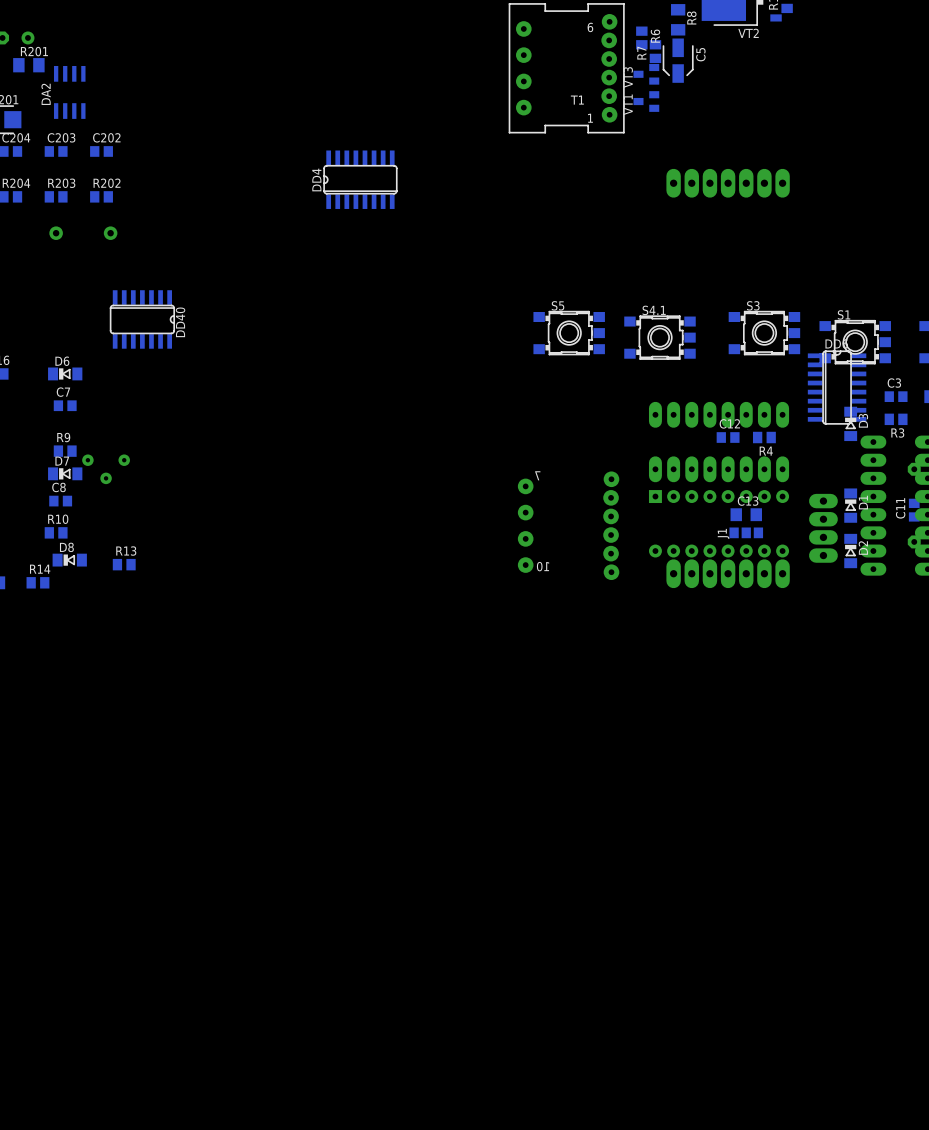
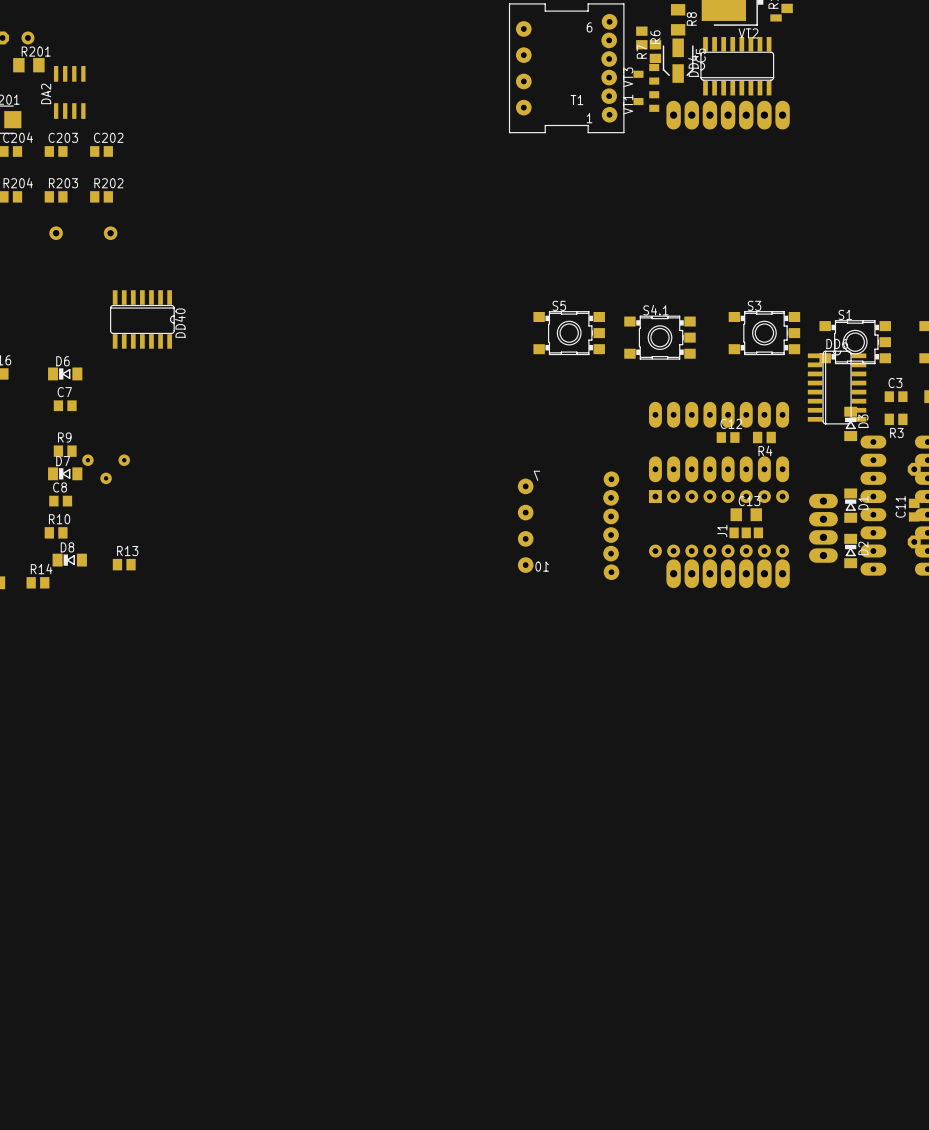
DD4 position: (360, 179) -> (737, 66)
part position: (728, 183) -> (728, 115)

